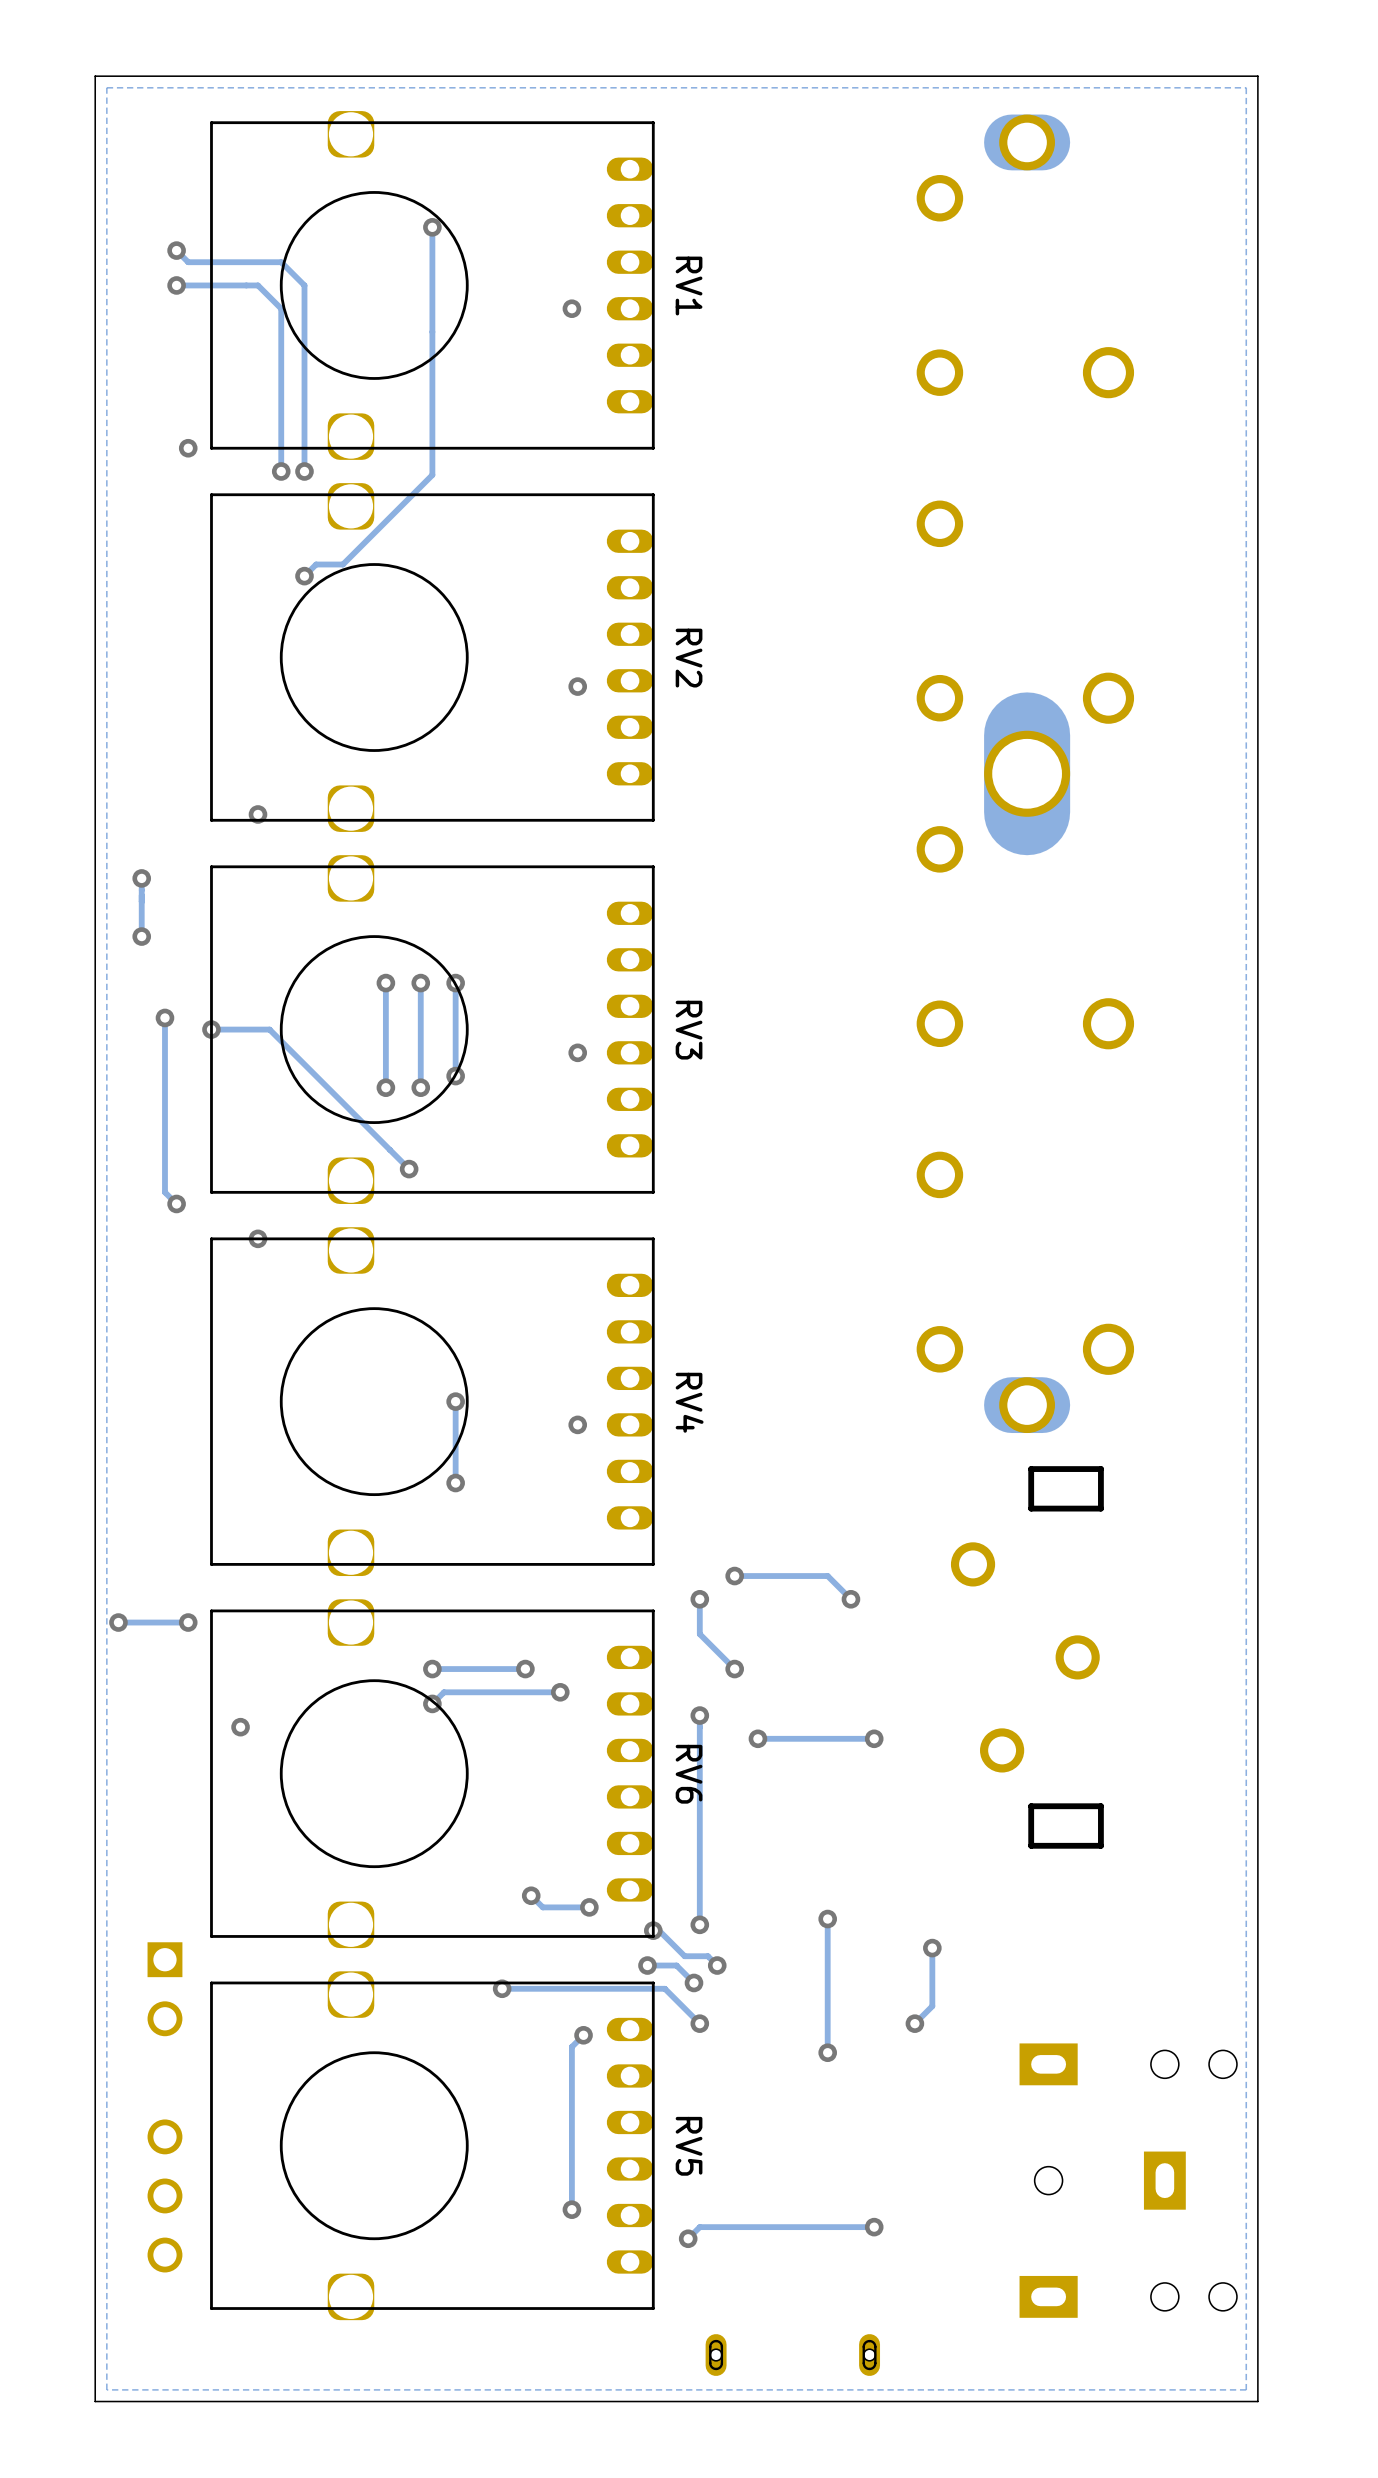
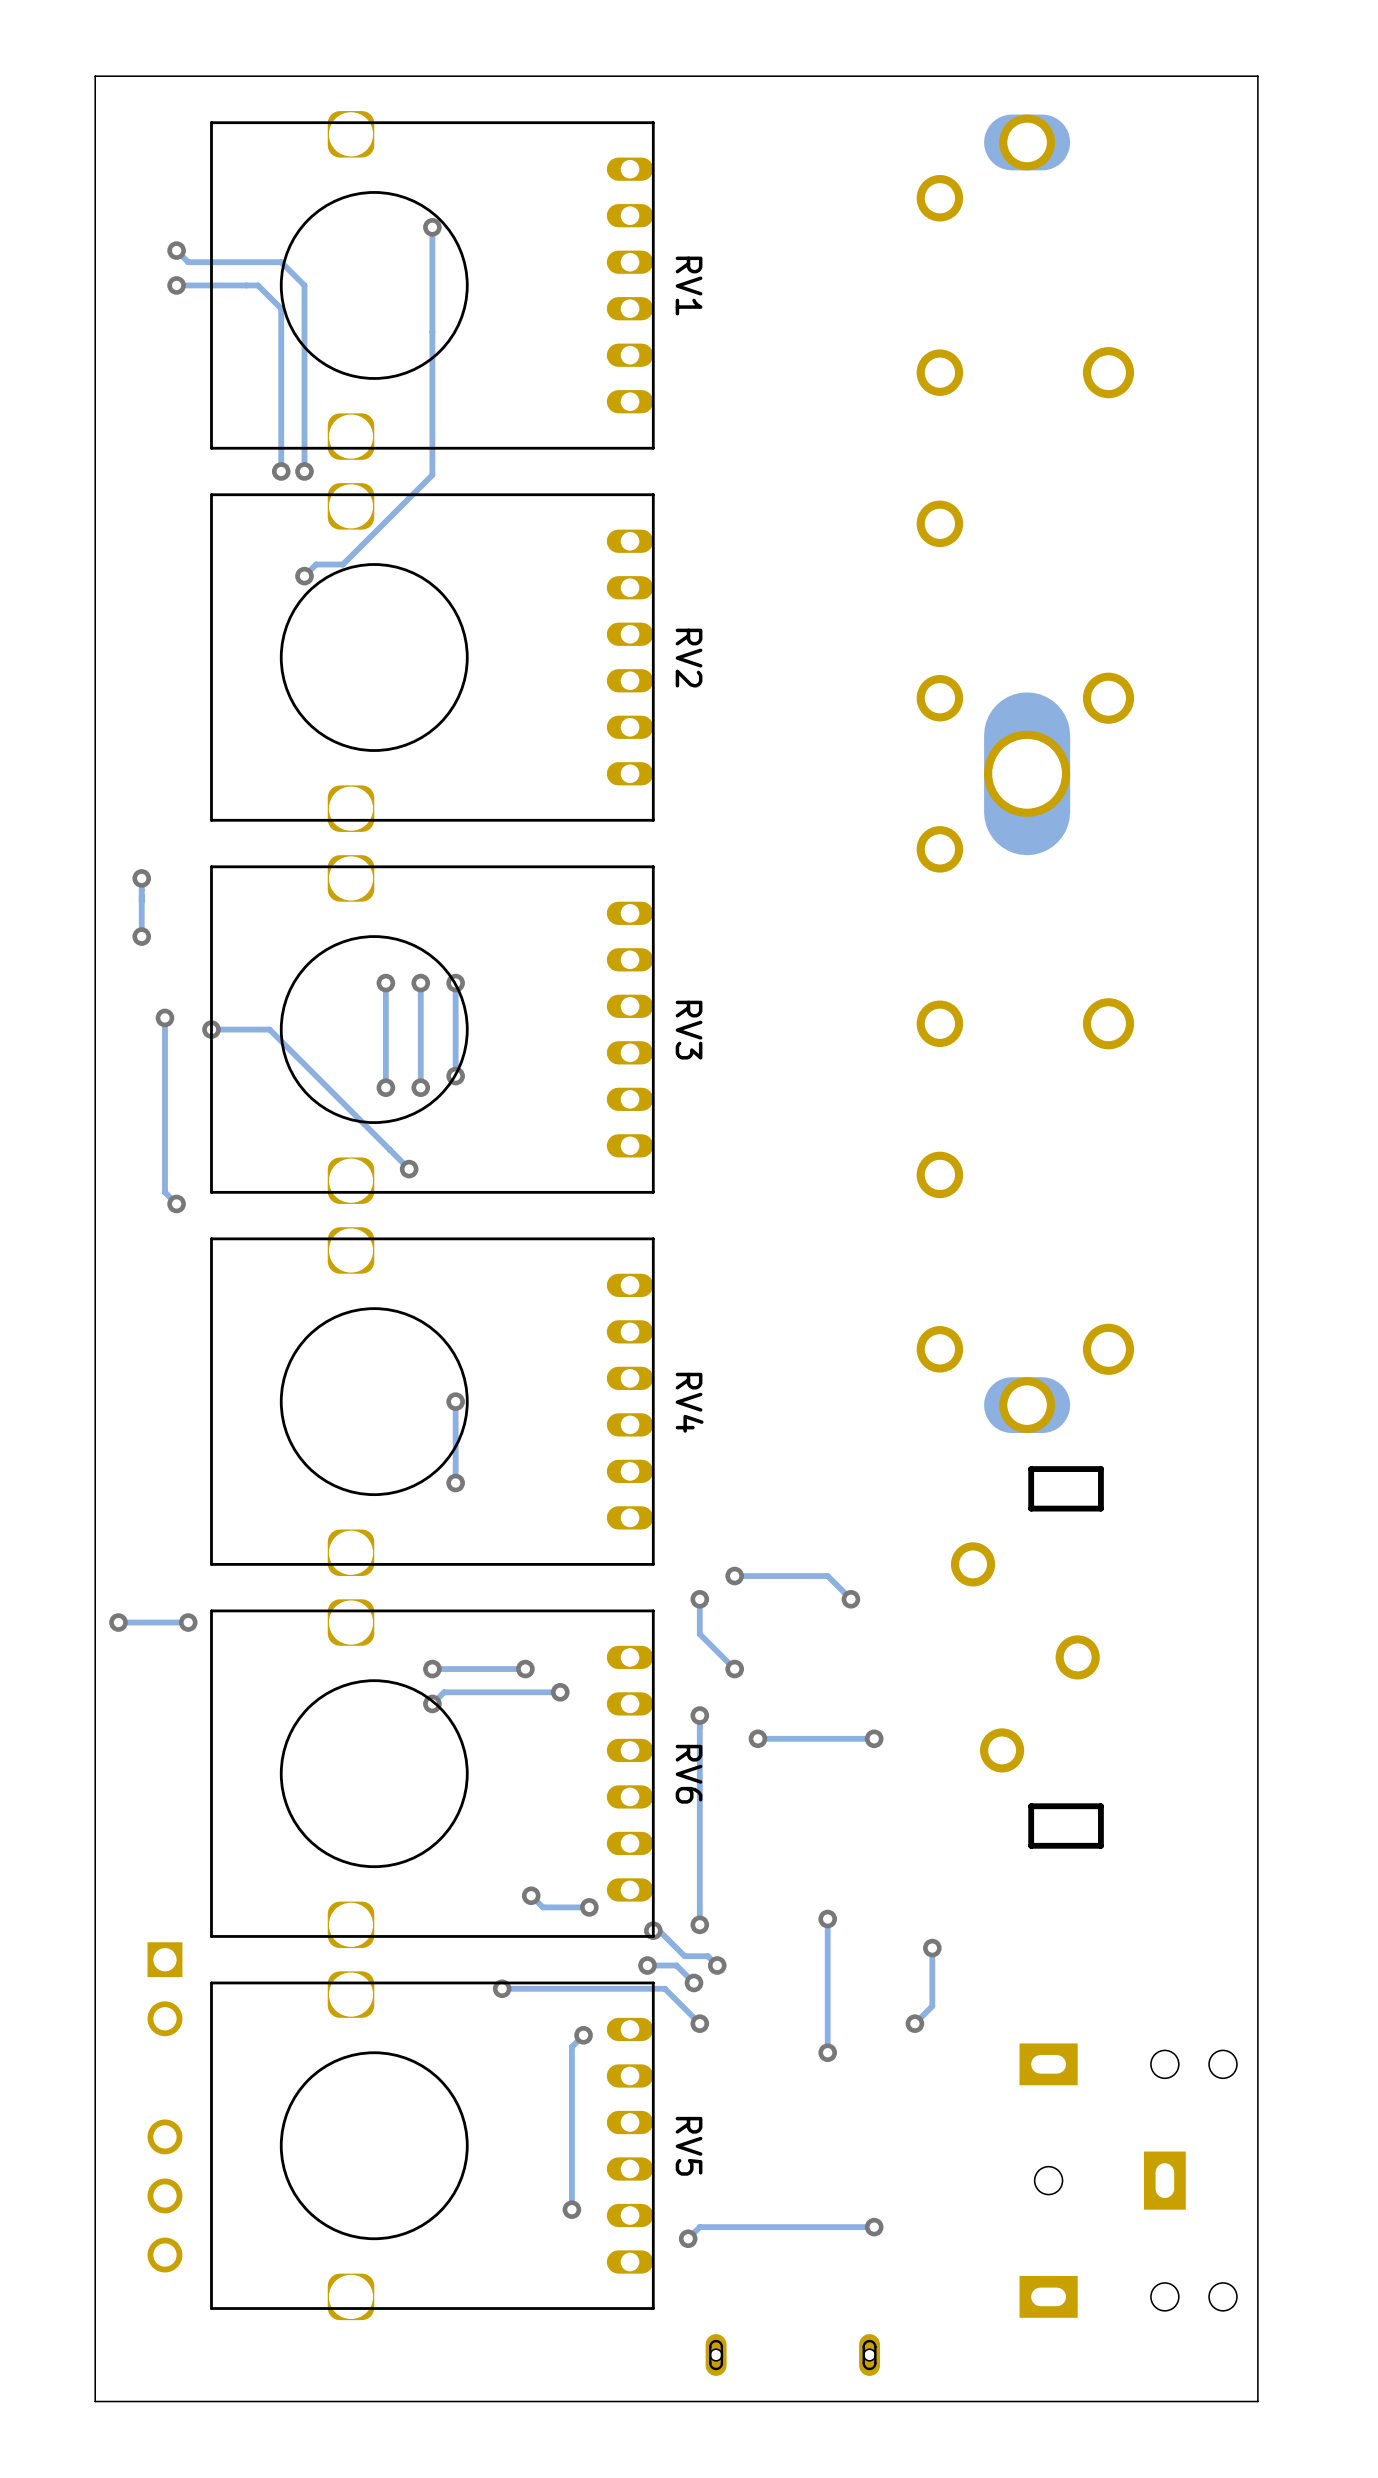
zone outline: (1246, 87) (106, 87) (106, 2389) (1246, 2389) (1246, 87) -> none
via: (571, 308) -> none
via: (188, 448) -> none
via: (577, 686) -> none
via: (257, 814) -> none
via: (577, 1052) -> none
via: (257, 1238) -> none
via: (577, 1424) -> none
via: (240, 1727) -> none

